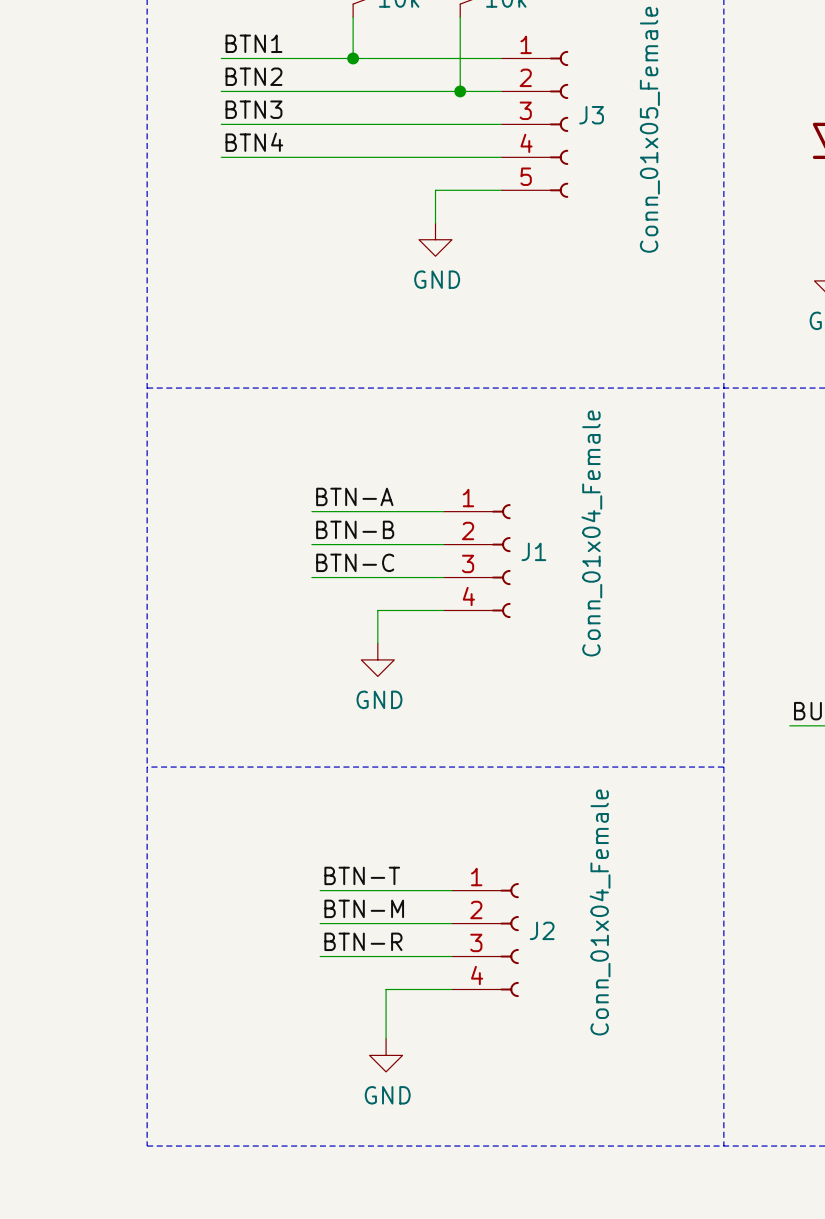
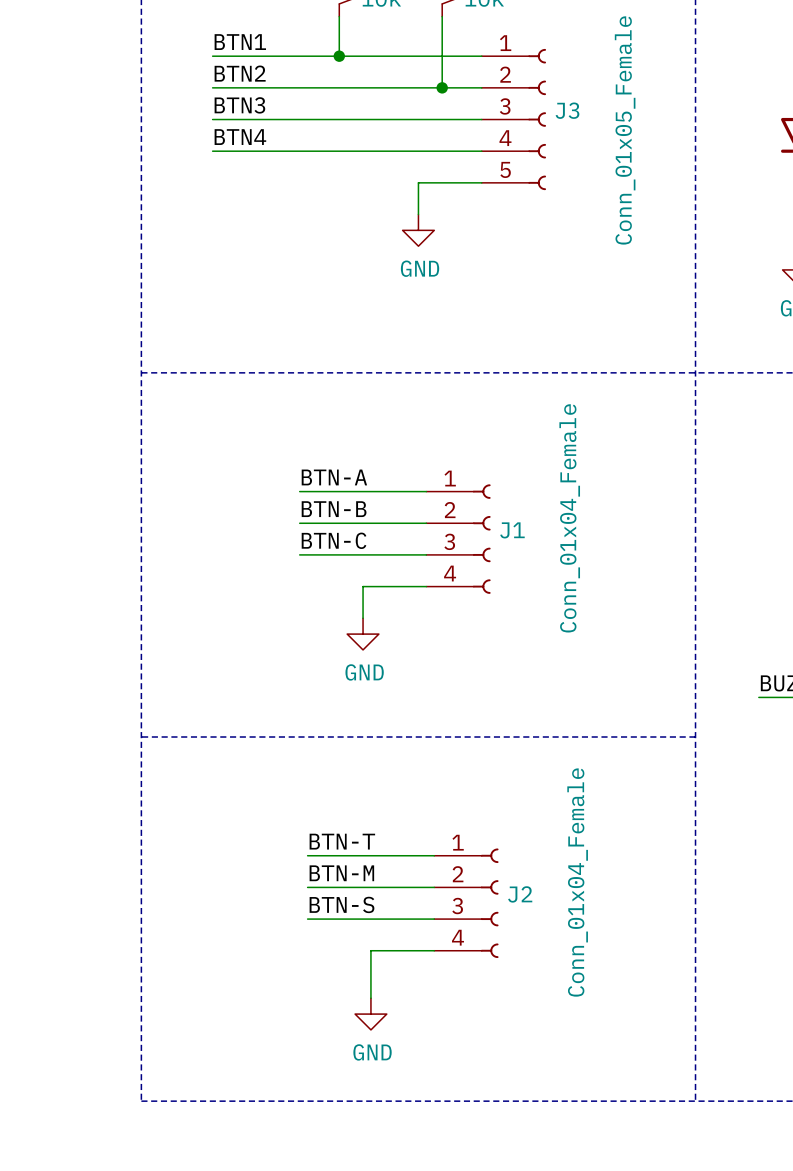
label: BTN-R (363, 941) -> BTN-S (341, 904)

